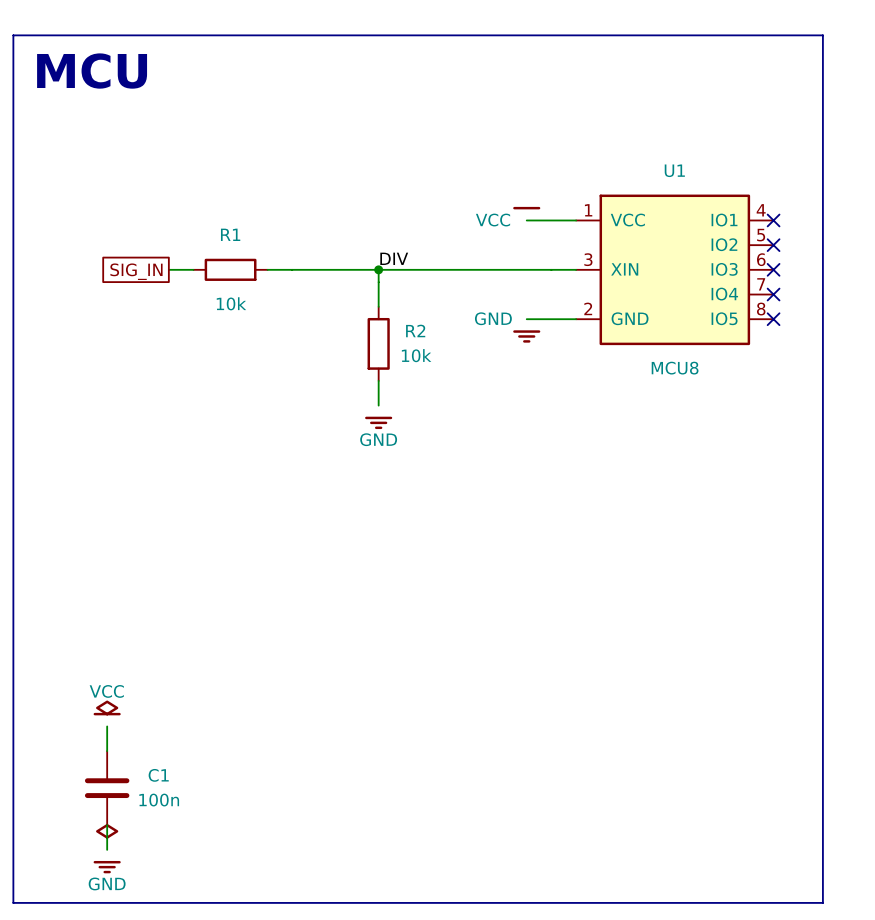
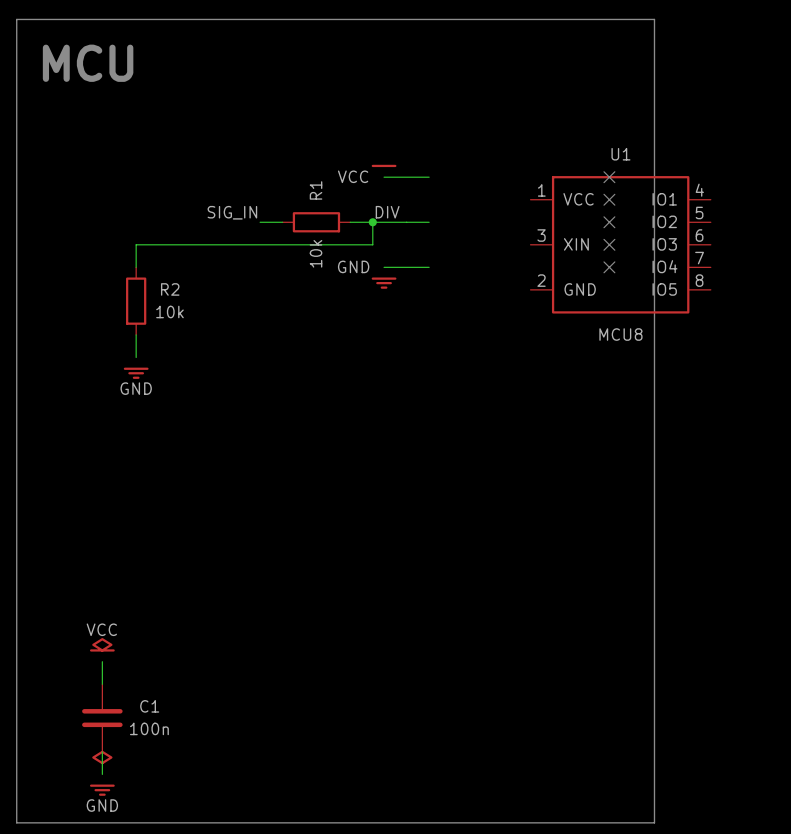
line: (13, 35) (822, 35) (822, 902) (711, 902) -> (16, 30) (16, 19) (654, 19) (654, 822)
no-connect mark: none -> (609, 177)
power symbol position: VCC (526, 208) -> VCC (384, 165)
wire: (526, 220) (576, 220) -> (384, 177) (429, 177)
no-connect mark: none -> (609, 199)
no-connect mark: (773, 220) -> none
R1 name rotation: 0° (230, 234) -> 90° counterclockwise (316, 190)
label: none -> SIG_IN (232, 212)
wire: none -> (260, 222) (282, 222)
wire: none -> (350, 222) (429, 222)
no-connect mark: none -> (609, 222)
no-connect mark: (773, 245) -> none
label position: DIV (394, 258) -> DIV (387, 212)
wire: none -> (158, 244) (136, 244) (136, 267)
wire: none -> (181, 244) (248, 244)
R1 position: (230, 269) -> (316, 222)
wire: (378, 269) (378, 306) -> none
junction position: (378, 269) -> (372, 222)
wire: (403, 269) (576, 269) -> (372, 244) (372, 222)
no-connect mark: none -> (609, 244)
no-connect mark: (773, 269) -> none
global label: SIG_IN (136, 271) -> none
no-connect mark: none -> (609, 267)
no-connect mark: (773, 294) -> none
R1 value rotation: 0° (231, 303) -> 90° counterclockwise (316, 253)
power symbol: none -> GND (384, 283)
wire: (526, 319) (576, 319) -> (384, 267) (429, 267)
no-connect mark: (773, 319) -> none
power symbol: GND (526, 336) -> none
R2 position: (378, 343) -> (136, 301)
wire: (378, 380) (378, 405) -> (136, 334) (136, 357)
power symbol: none -> GND (136, 373)
power symbol: GND (378, 422) -> none

